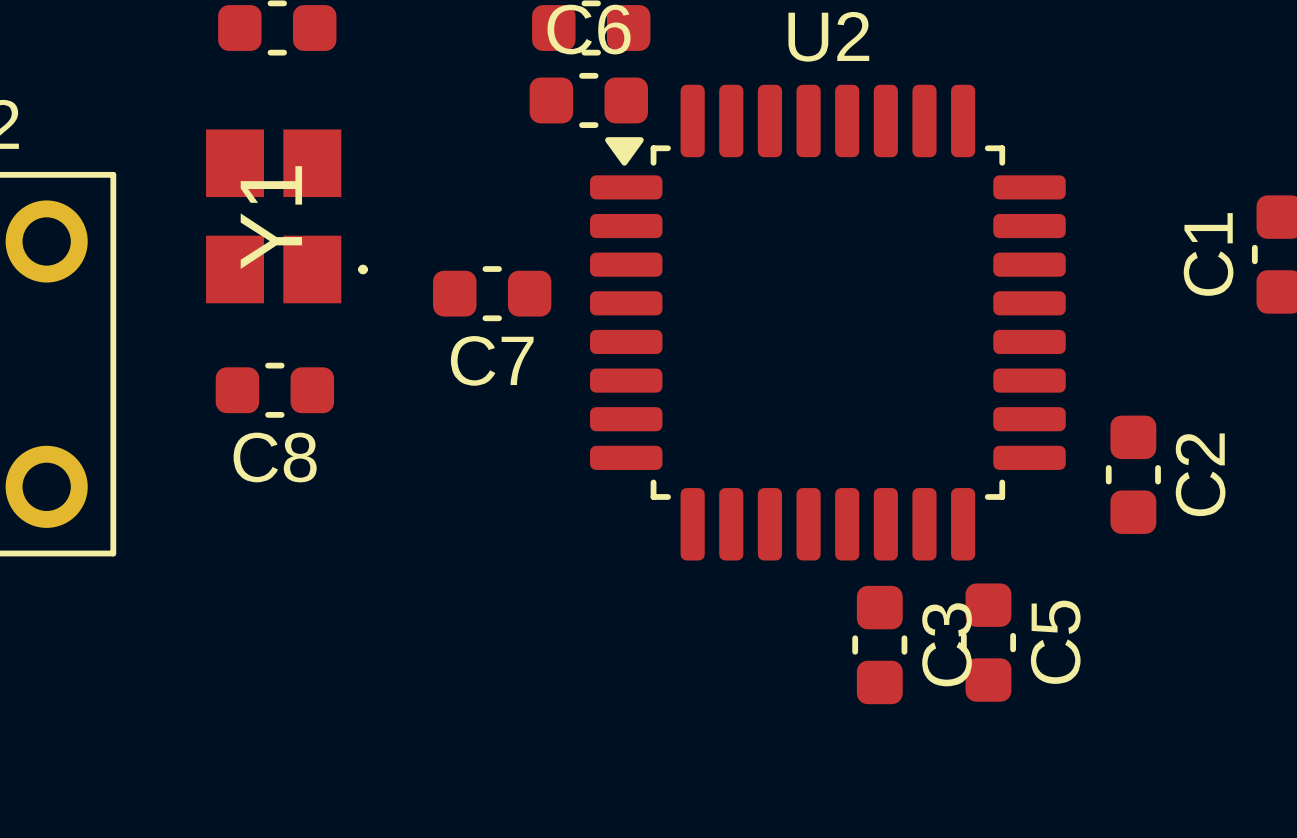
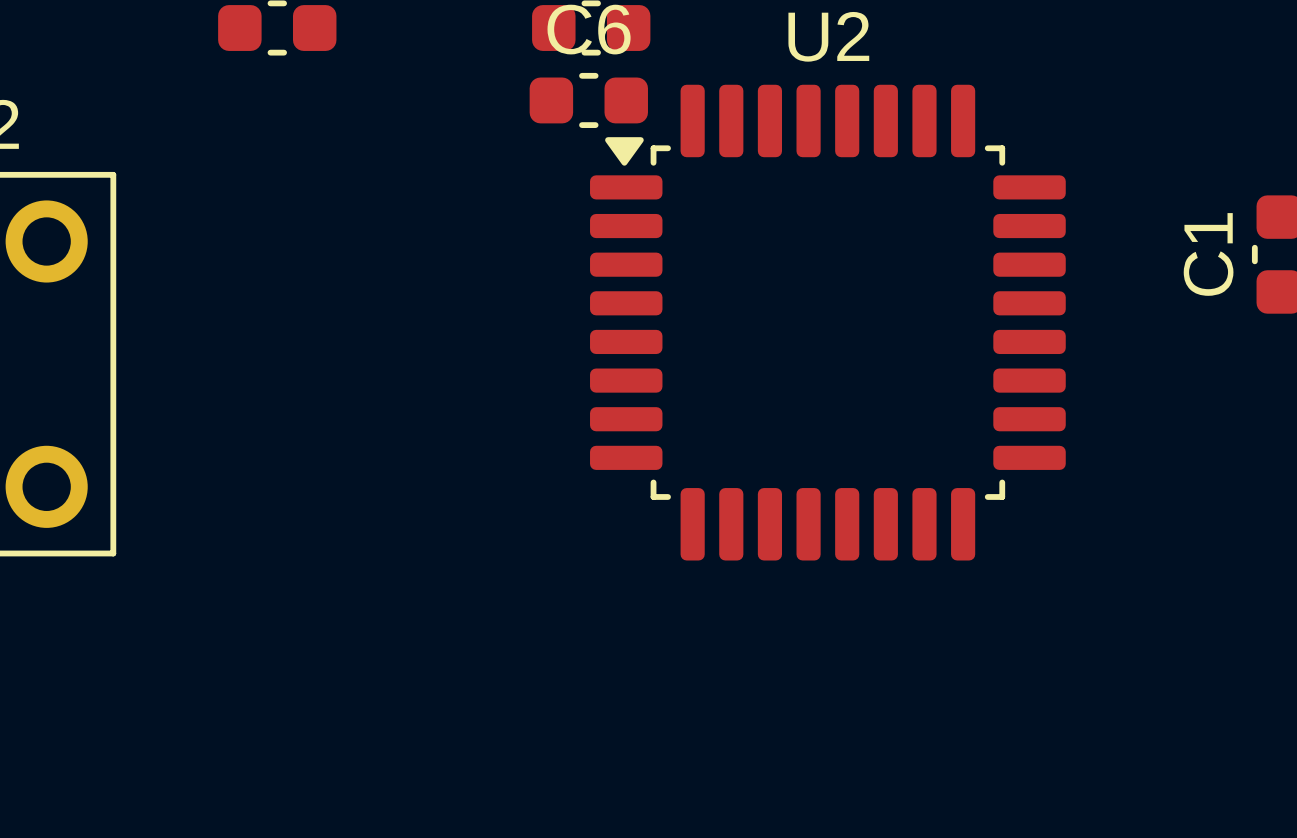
Y1: (286, 216) -> none
C7: (492, 293) -> none
C8: (274, 390) -> none
C2: (1133, 474) -> none
C5: (988, 642) -> none
C3: (879, 645) -> none

